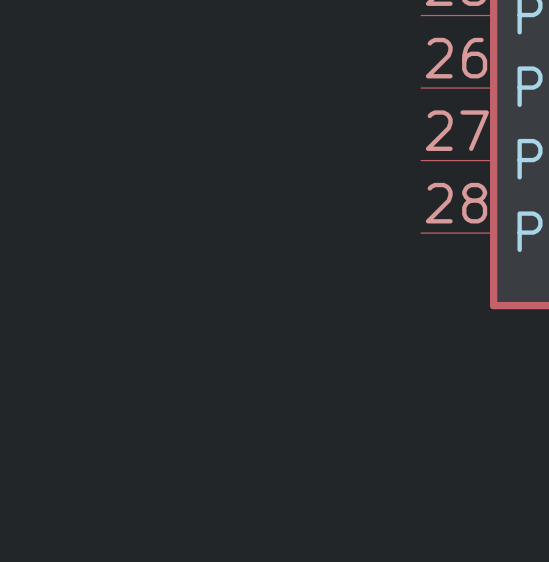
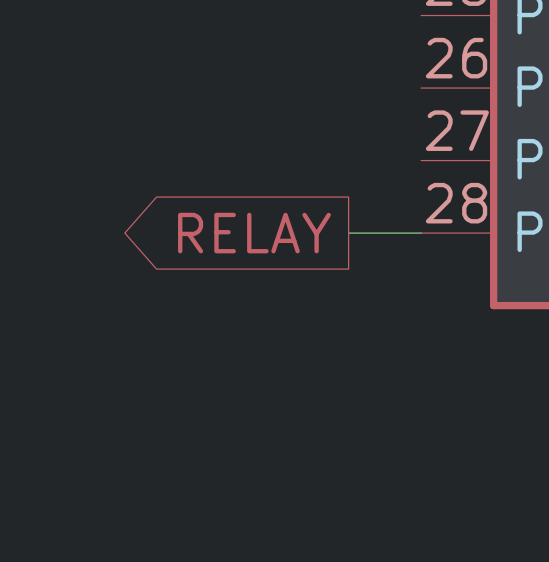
global label: none -> RELAY (254, 233)
wire: none -> (348, 233) (421, 233)

